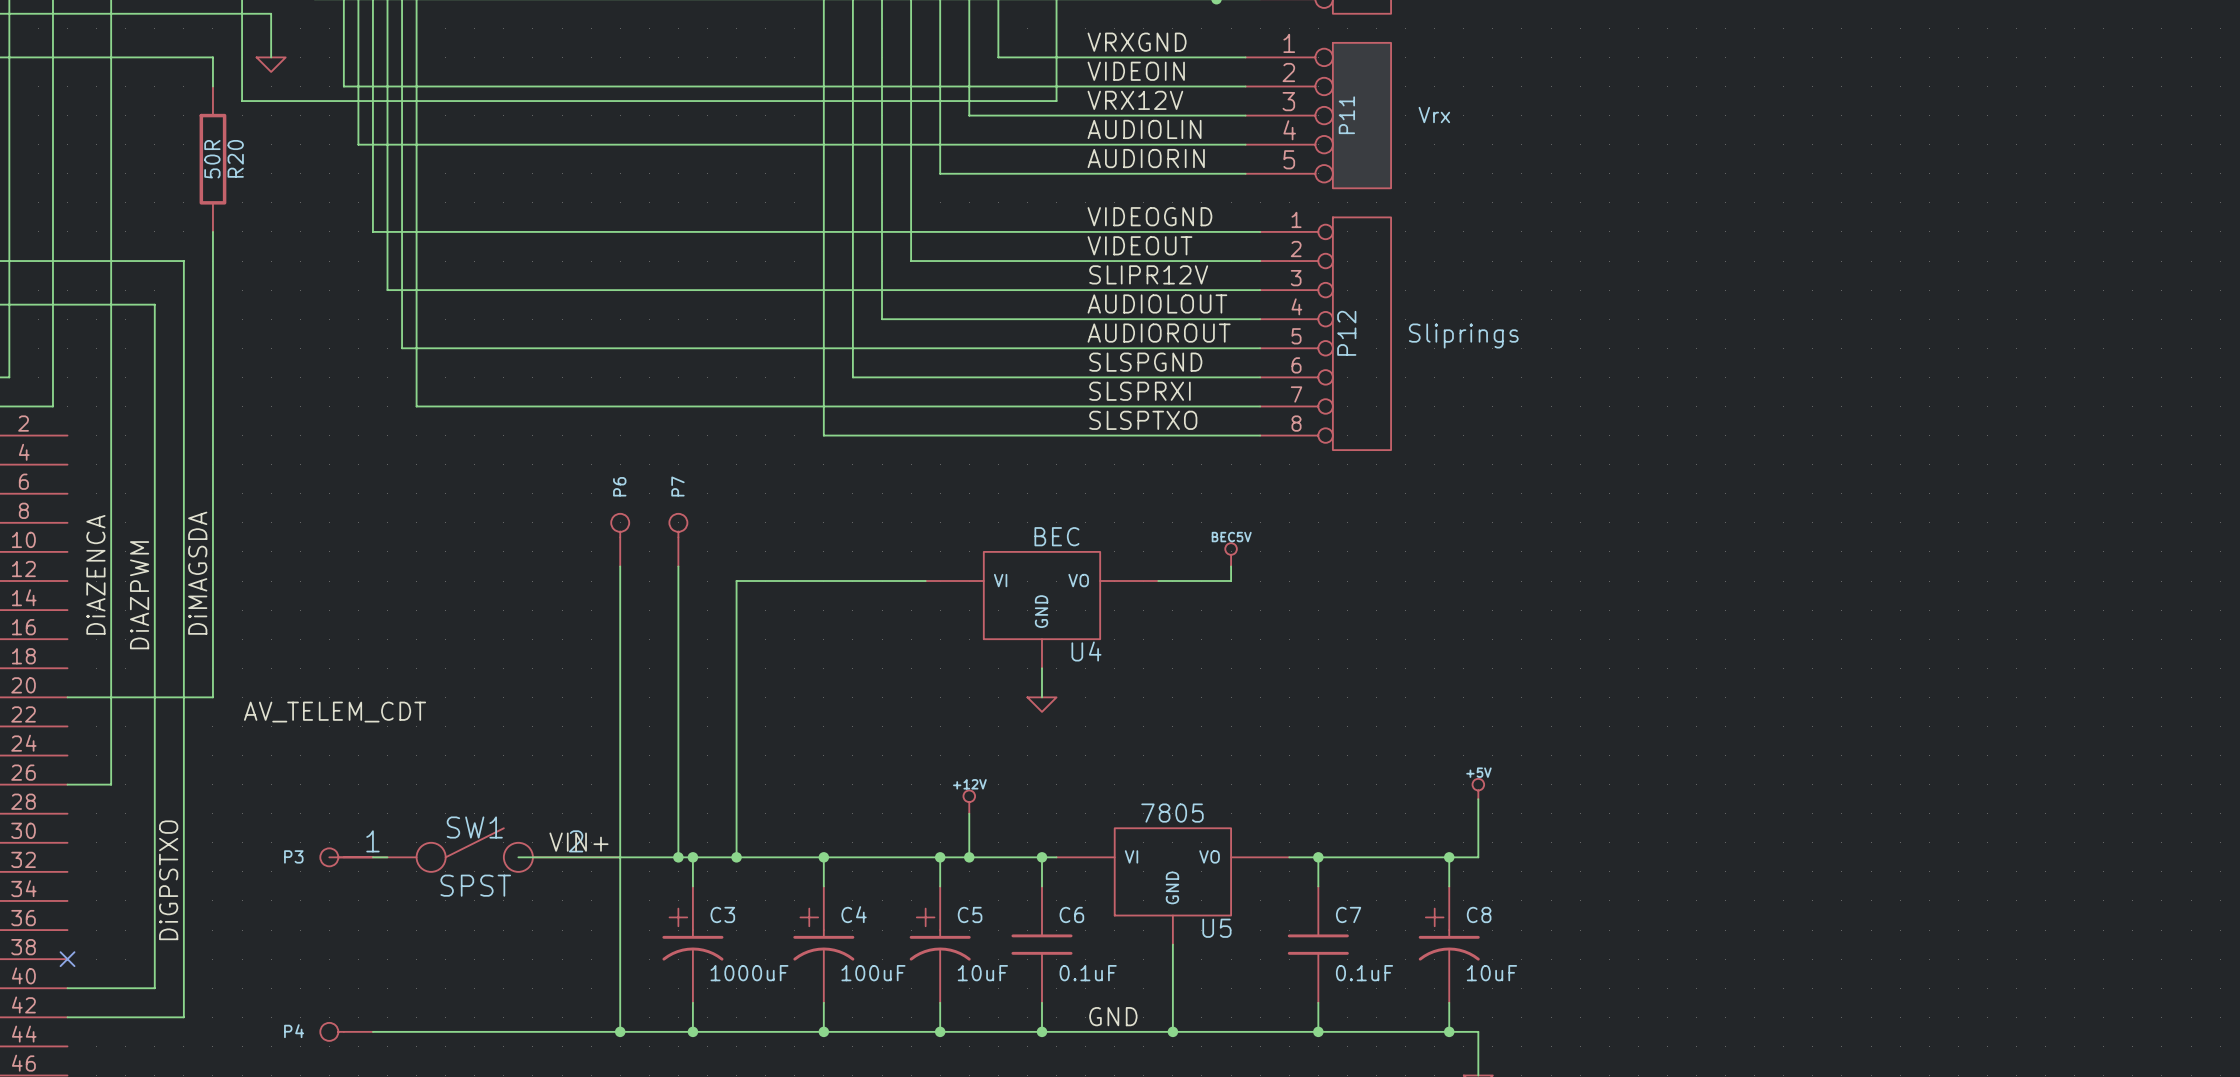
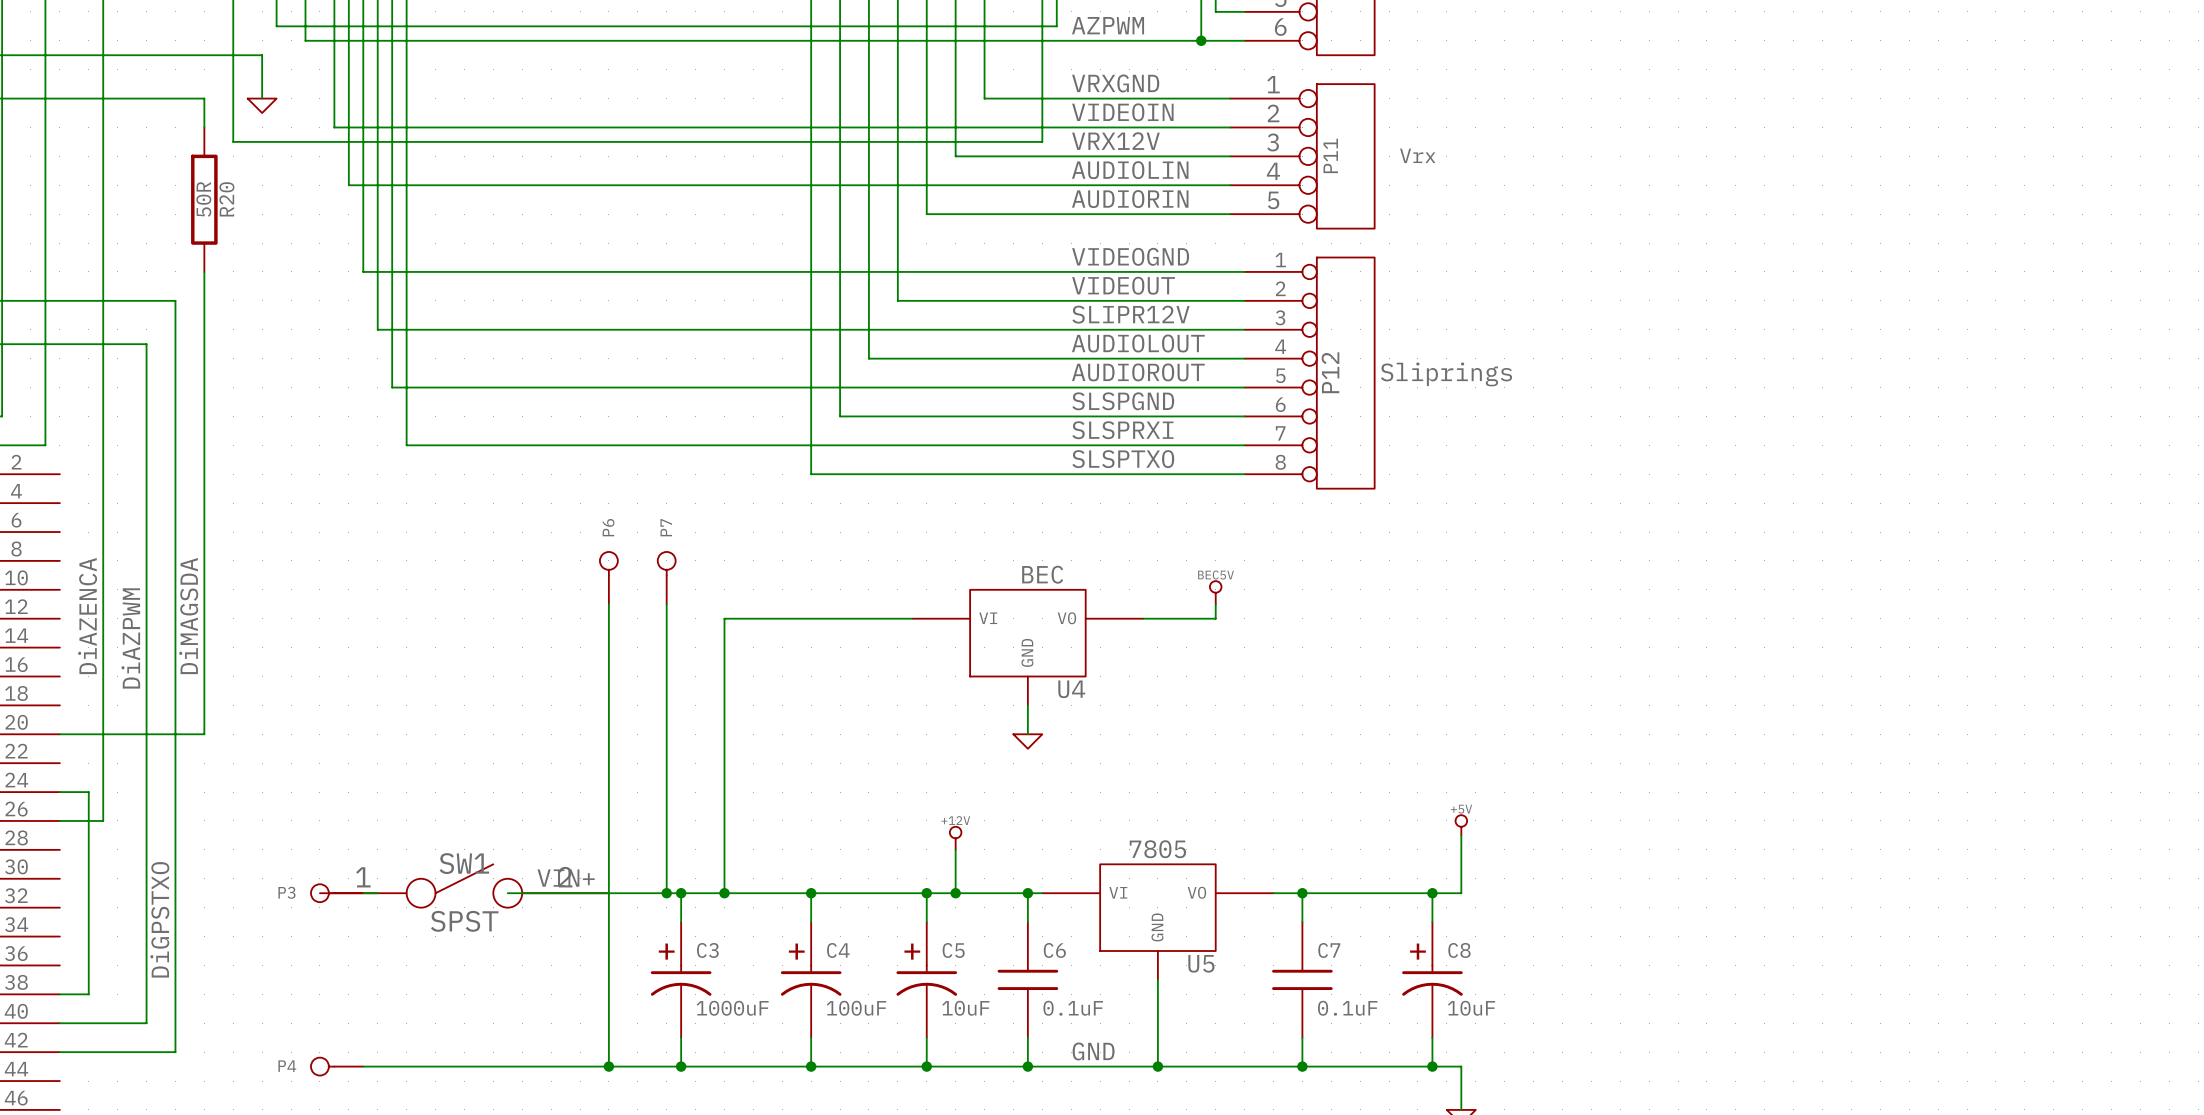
label: AV_TELEM_CDT (335, 712) -> none
wire: none -> (59, 792) (88, 792) (88, 994) (59, 994)
no-connect mark: (67, 959) -> none

